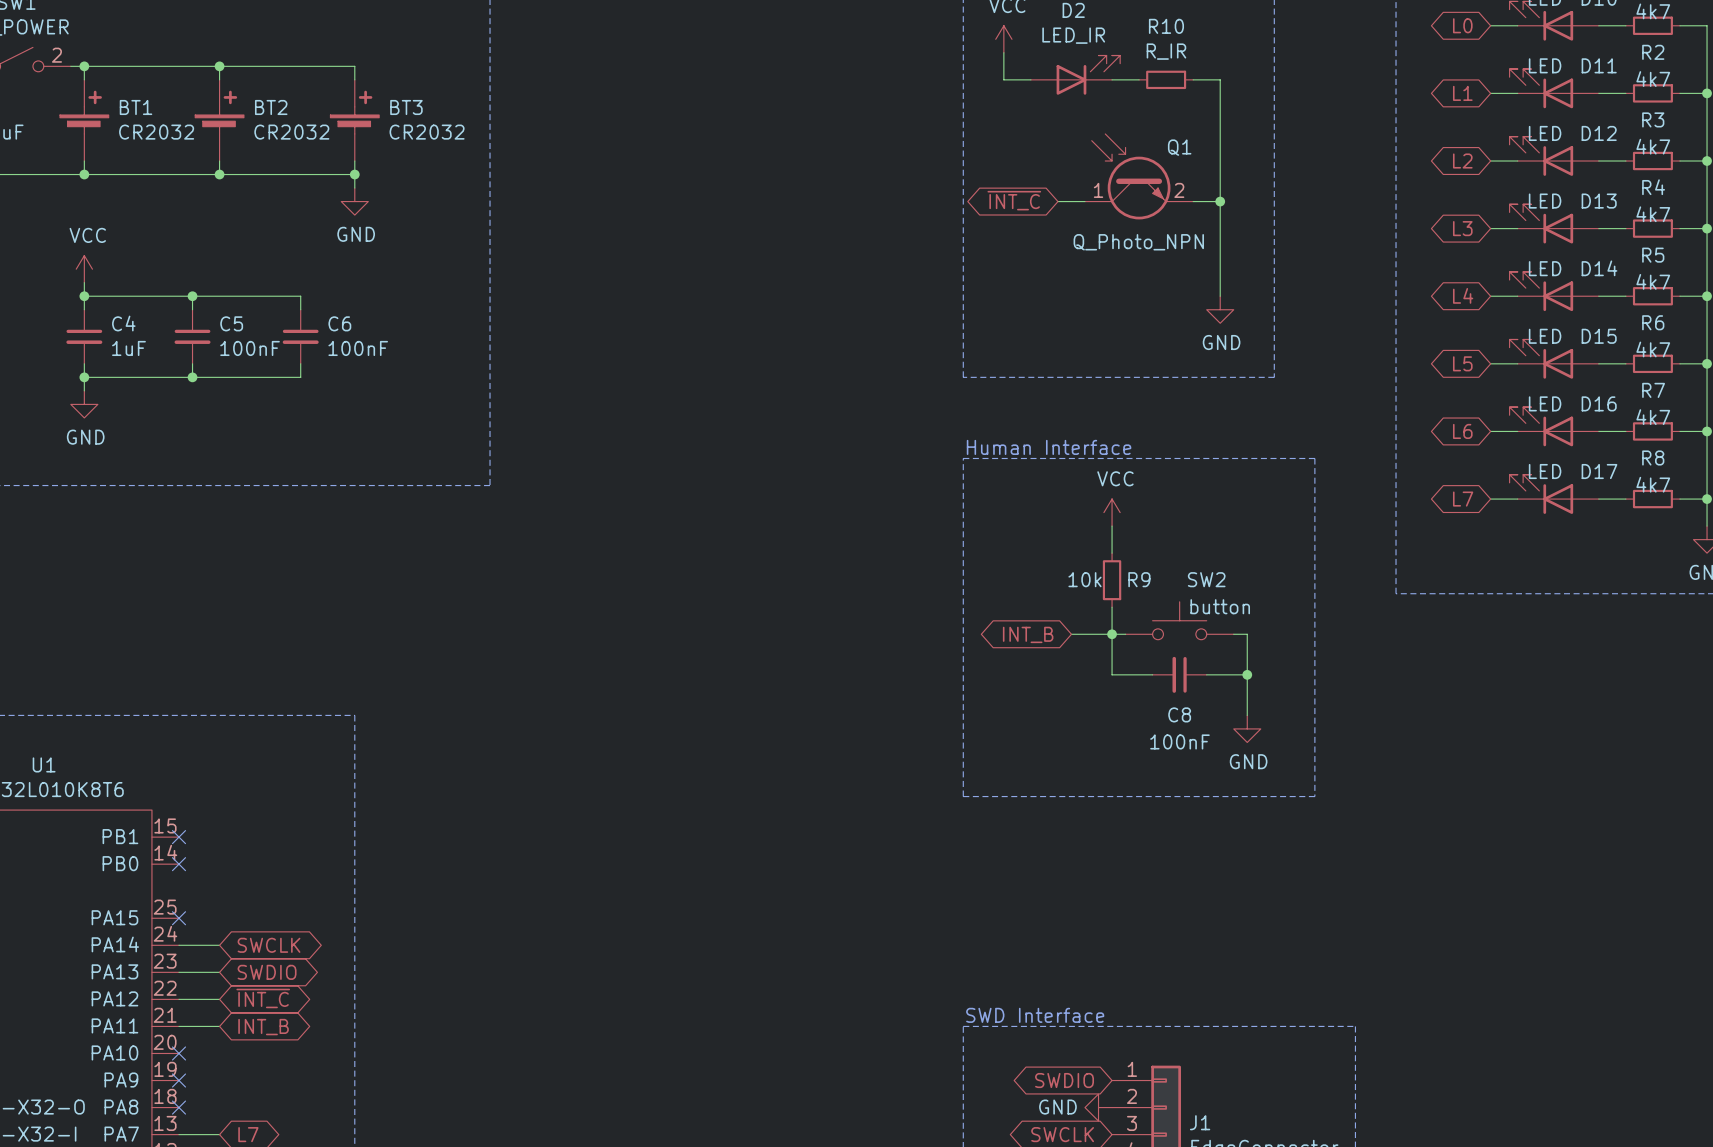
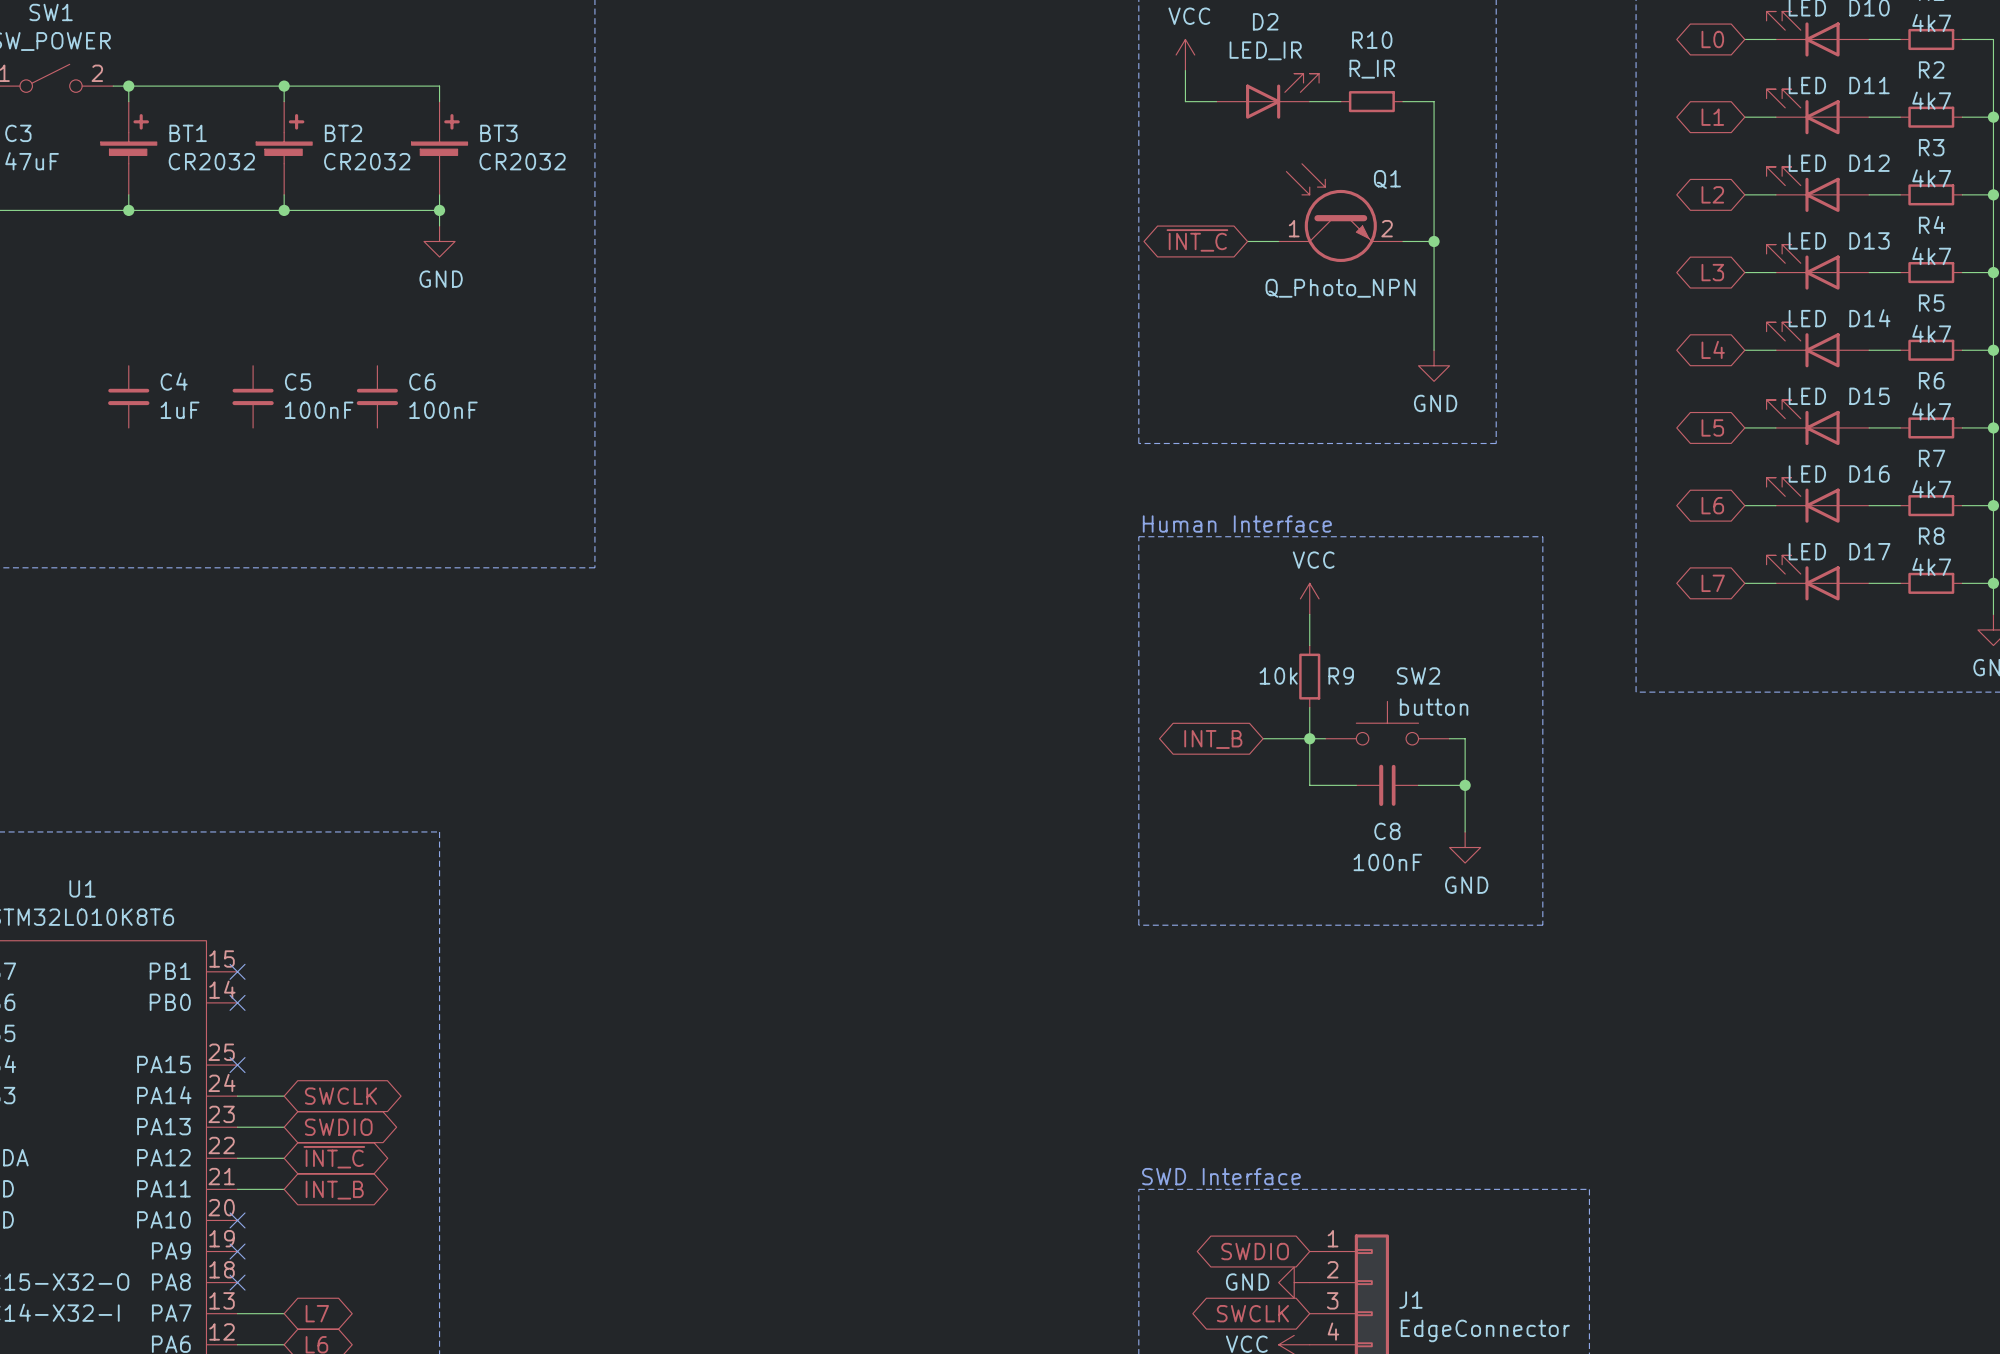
power symbol: VCC (84, 269) -> none
wire: (84, 282) (84, 309) -> none
wire: (84, 296) (300, 296) (300, 309) -> none
junction: (84, 296) -> none
wire: (192, 296) (192, 309) -> none
junction: (192, 296) -> none
wire: (84, 363) (84, 390) -> none
wire: (192, 363) (192, 377) -> none
wire: (300, 363) (300, 377) (84, 377) -> none
junction: (84, 377) -> none
junction: (192, 377) -> none
power symbol: GND (84, 404) -> none

